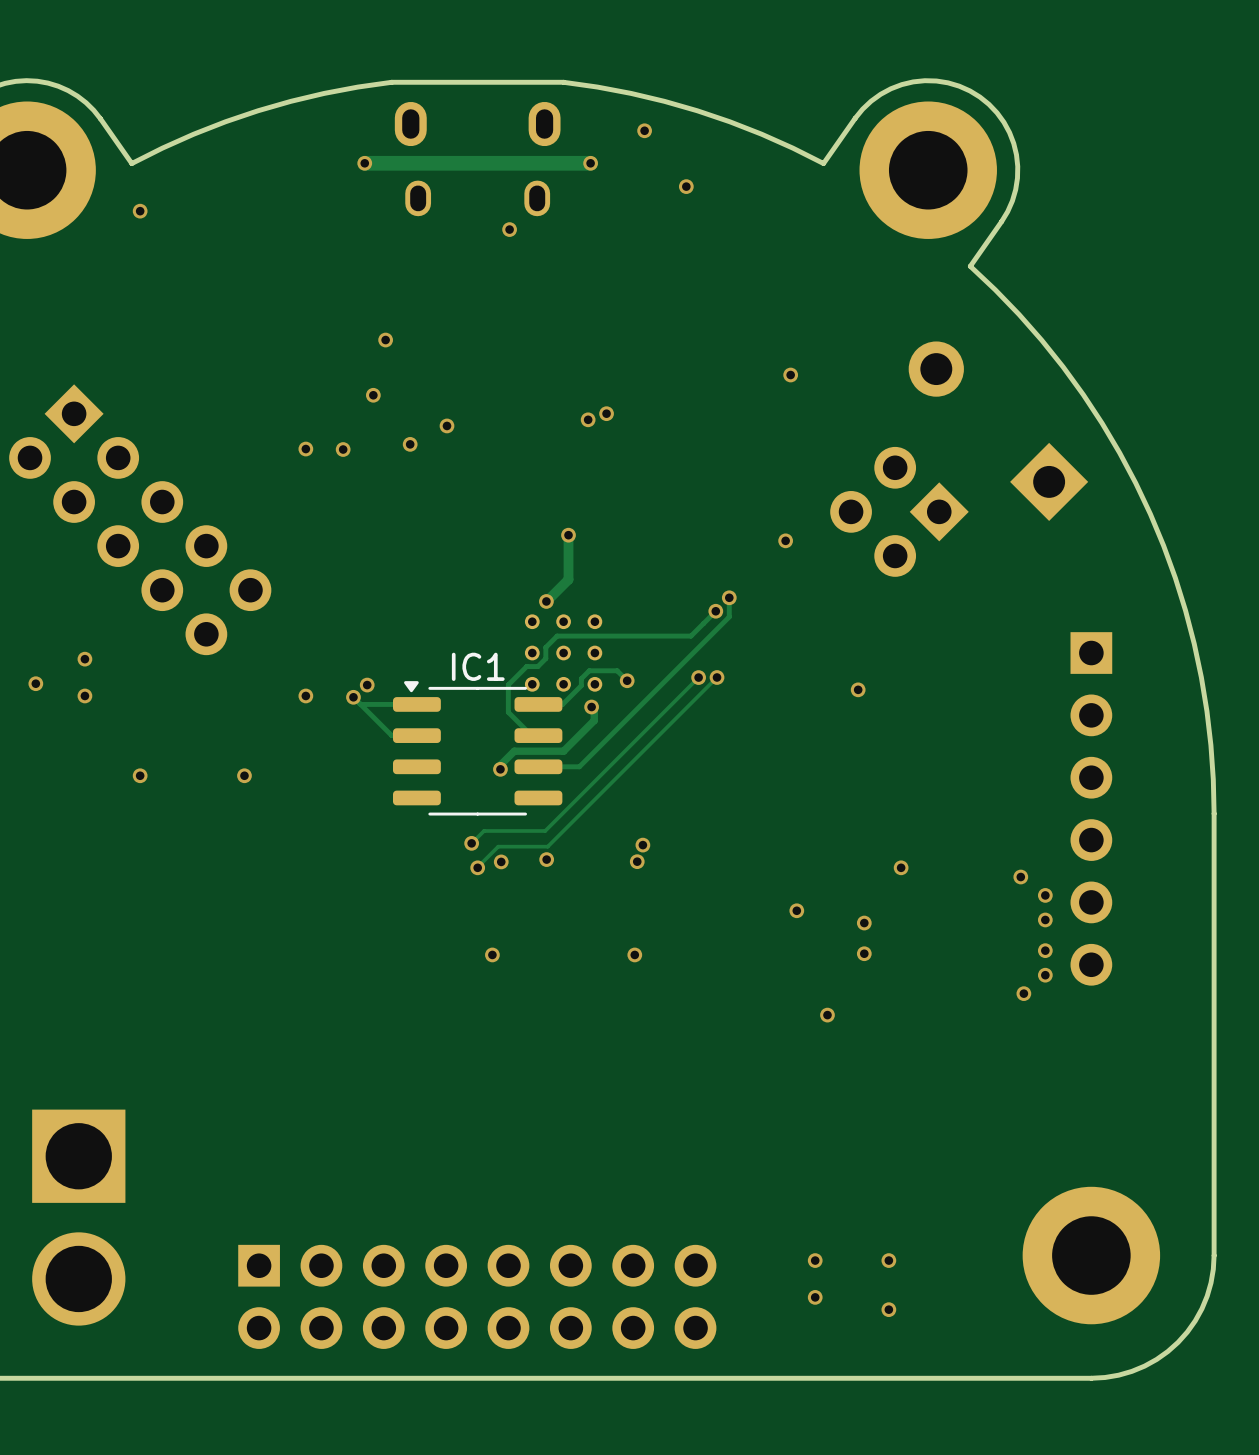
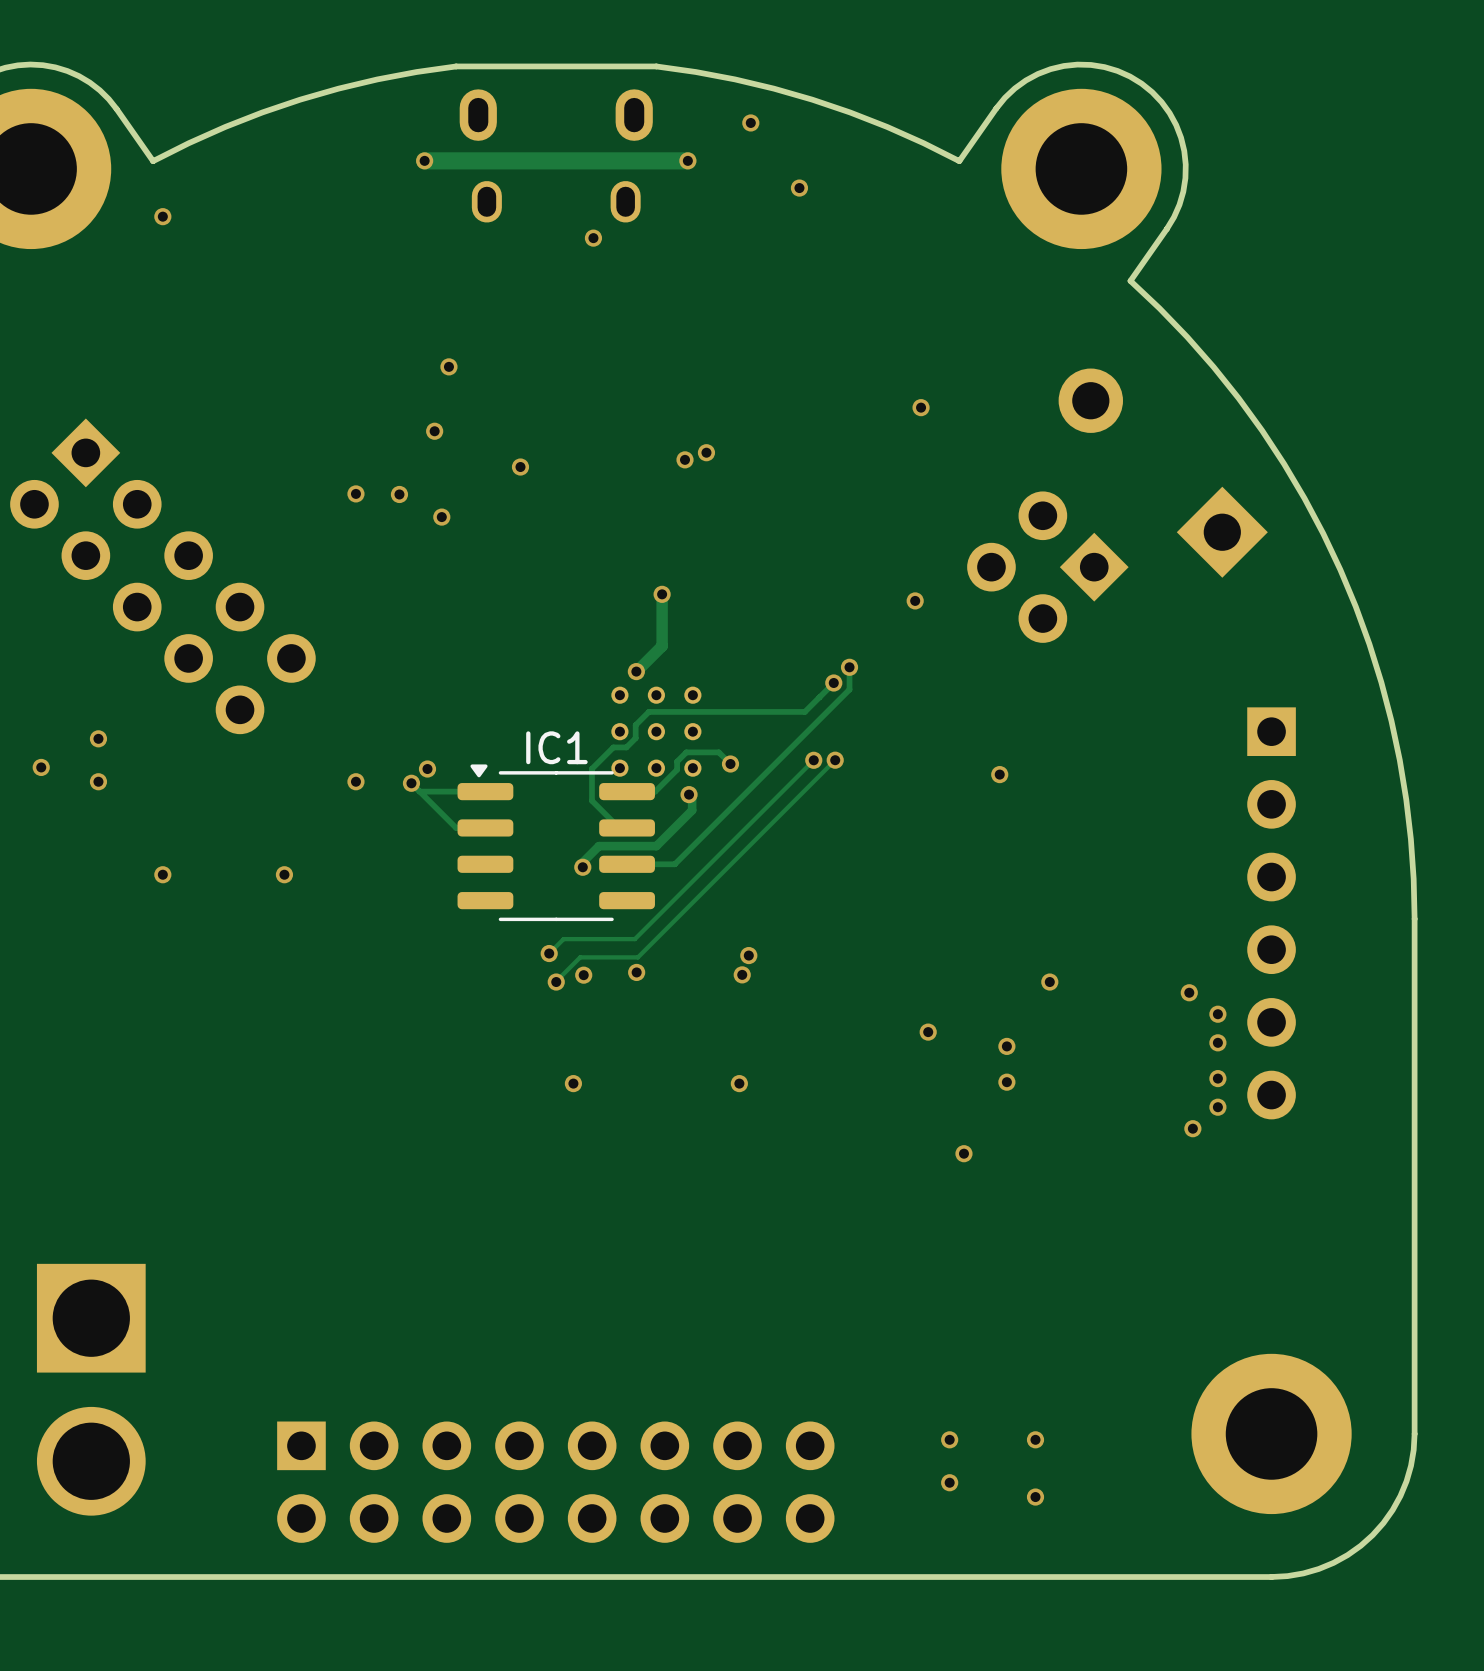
via position: (410, 444) -> (441, 517)

